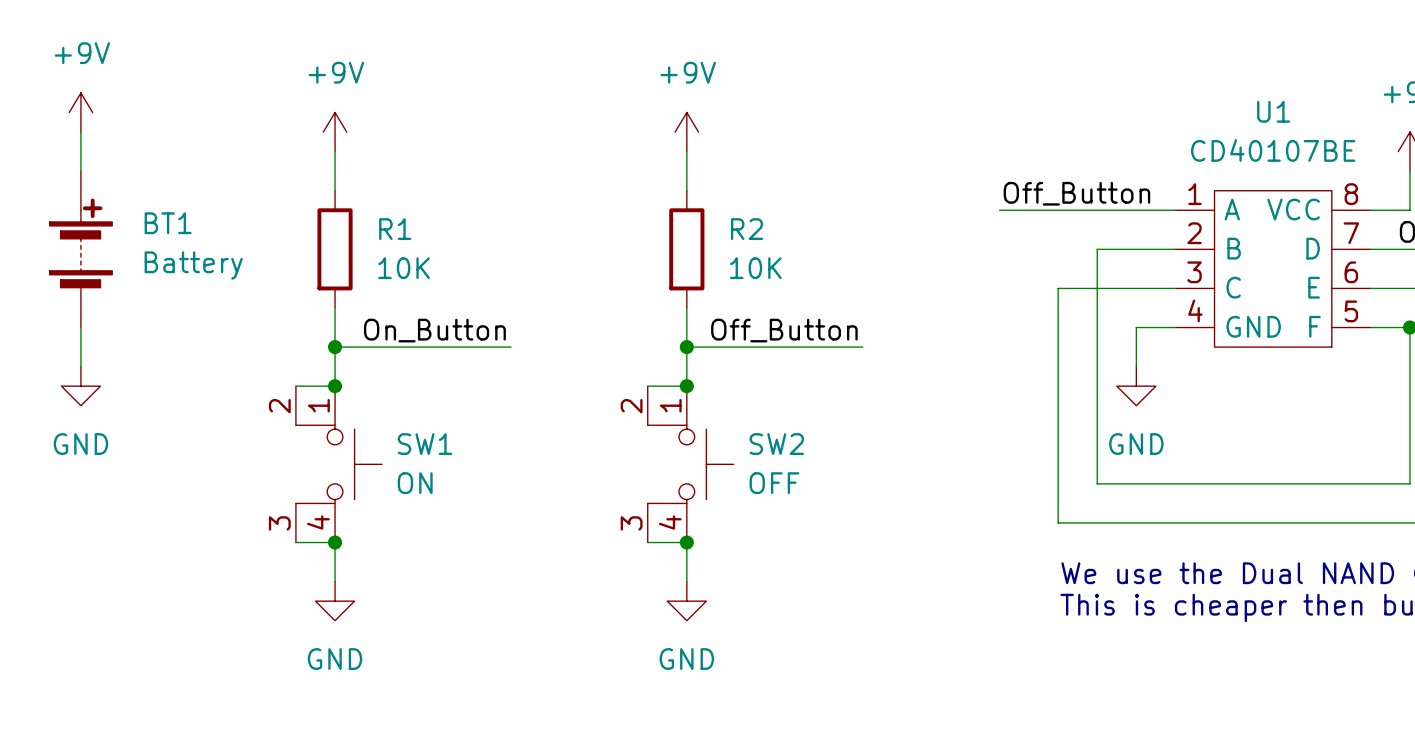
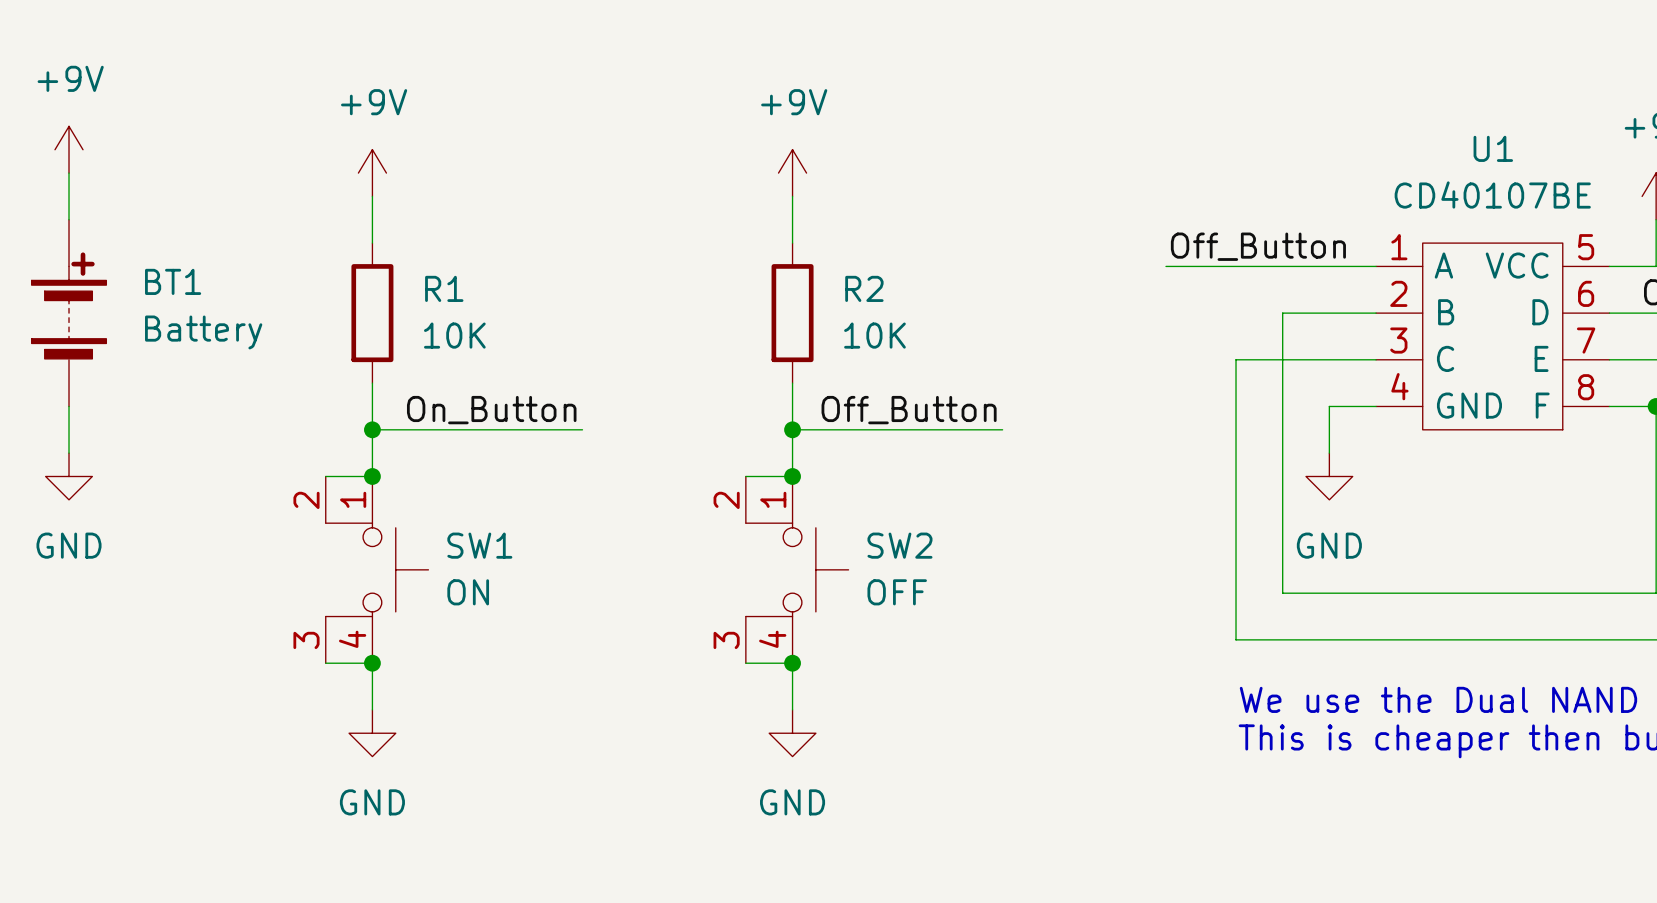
U1 pin number: 8 (1351, 194) -> 5 (1586, 247)
U1 pin number: 7 (1351, 233) -> 6 (1586, 293)
U1 pin number: 6 (1351, 272) -> 7 (1586, 340)
U1 pin number: 5 (1351, 311) -> 8 (1586, 387)

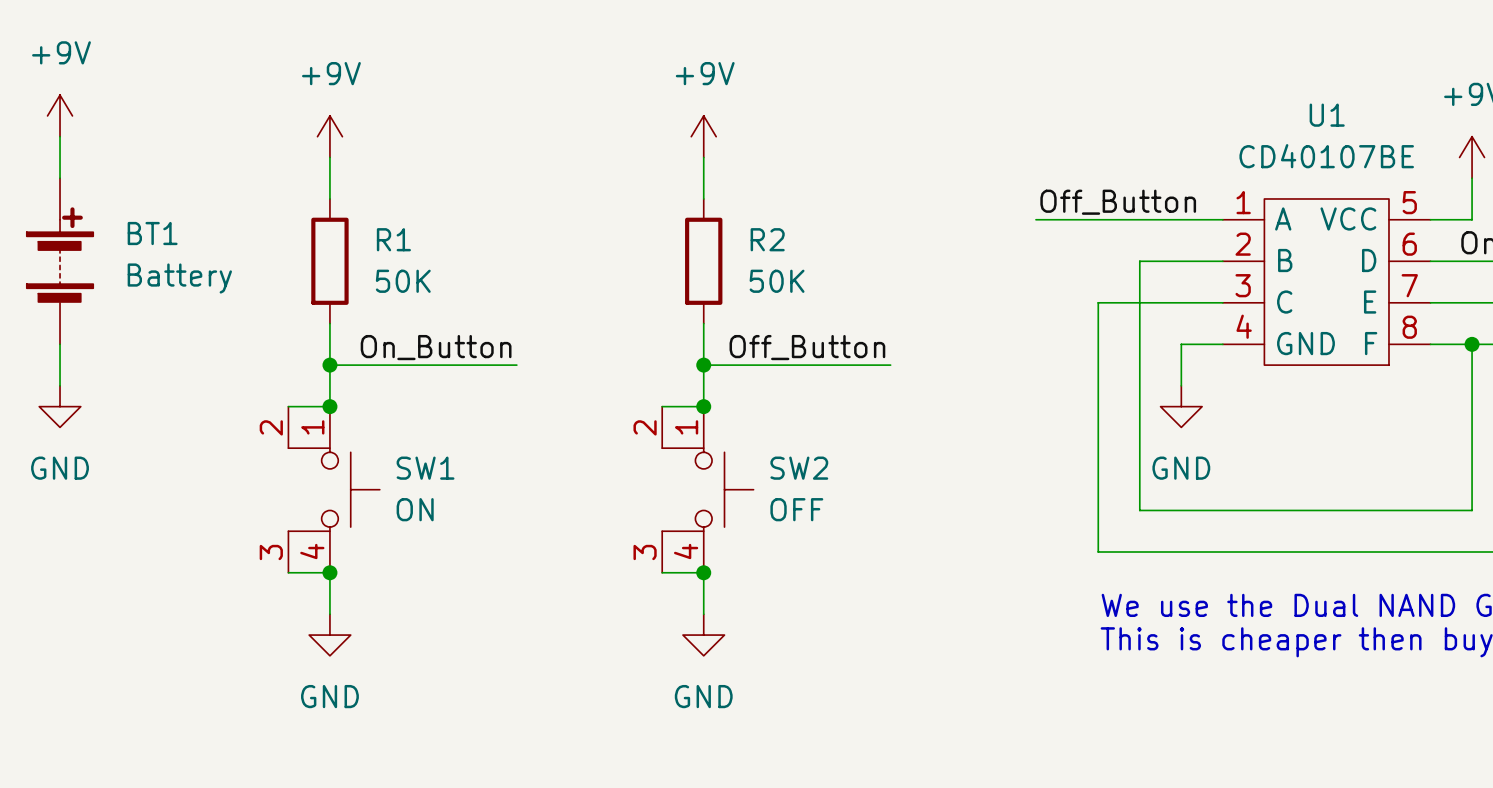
R1 value: 10K (454, 335) -> 50K (403, 281)
R2 value: 10K (874, 335) -> 50K (777, 281)

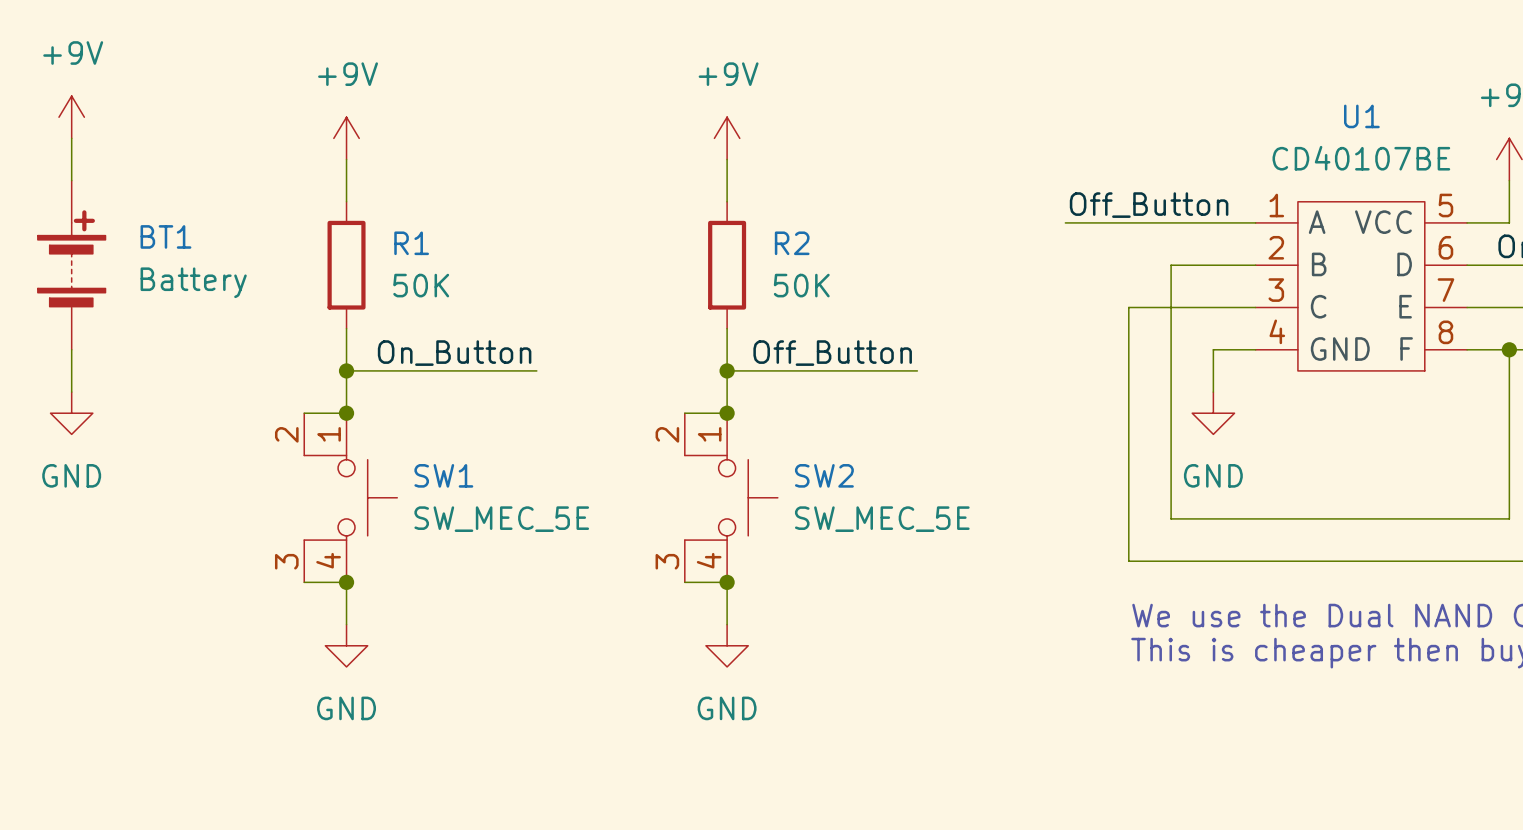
SW1 value: ON (415, 509) -> SW_MEC_5E (501, 519)
SW2 value: OFF (796, 509) -> SW_MEC_5E (882, 519)

